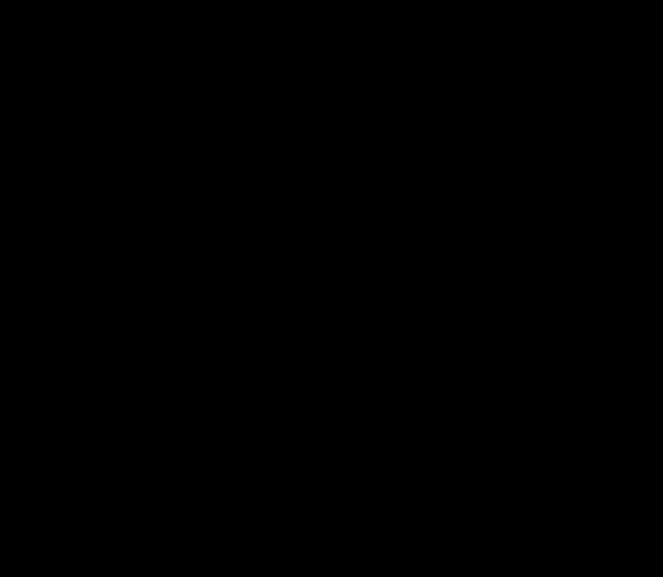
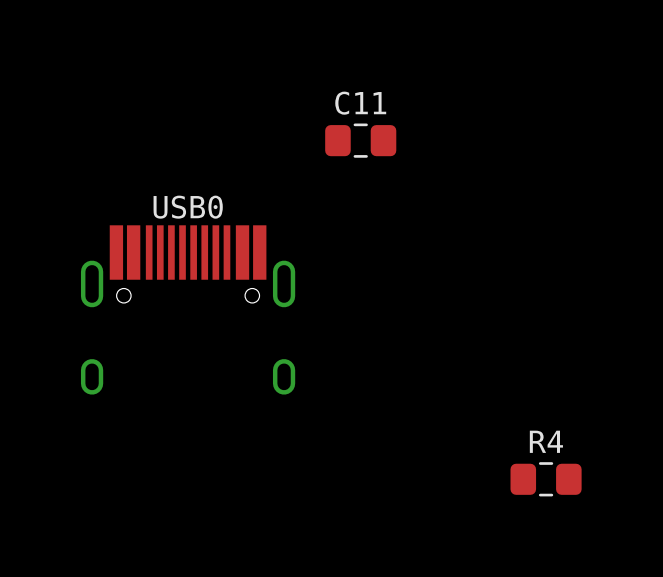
C11: none -> (360, 140)
USB0: none -> (188, 309)
R4: none -> (546, 479)

